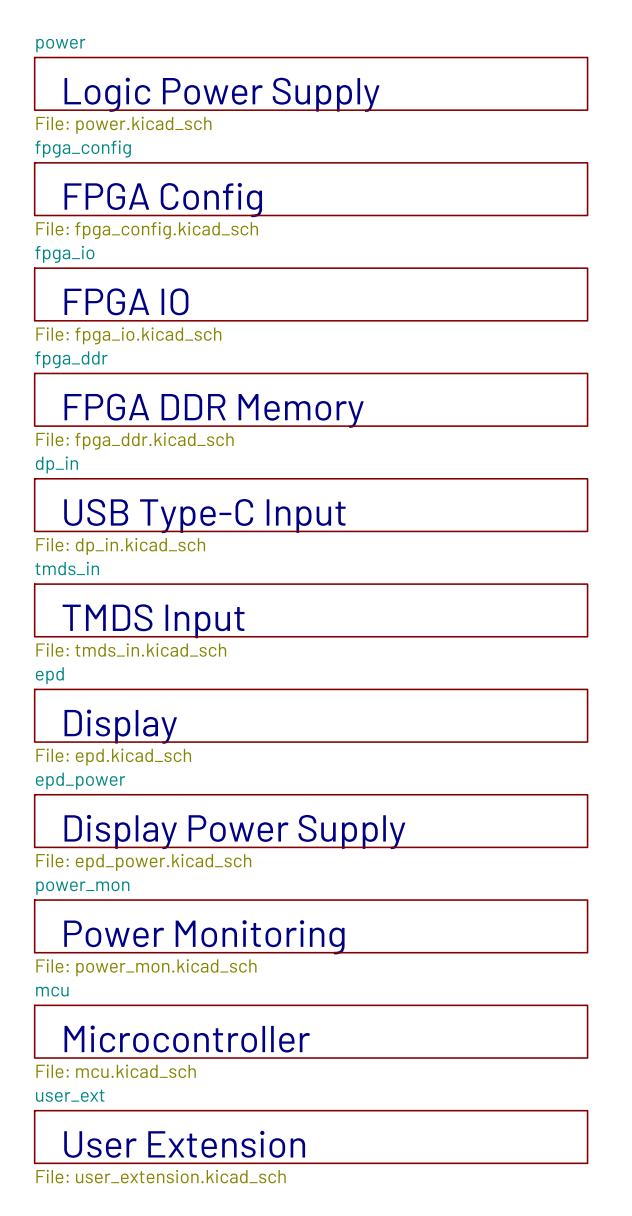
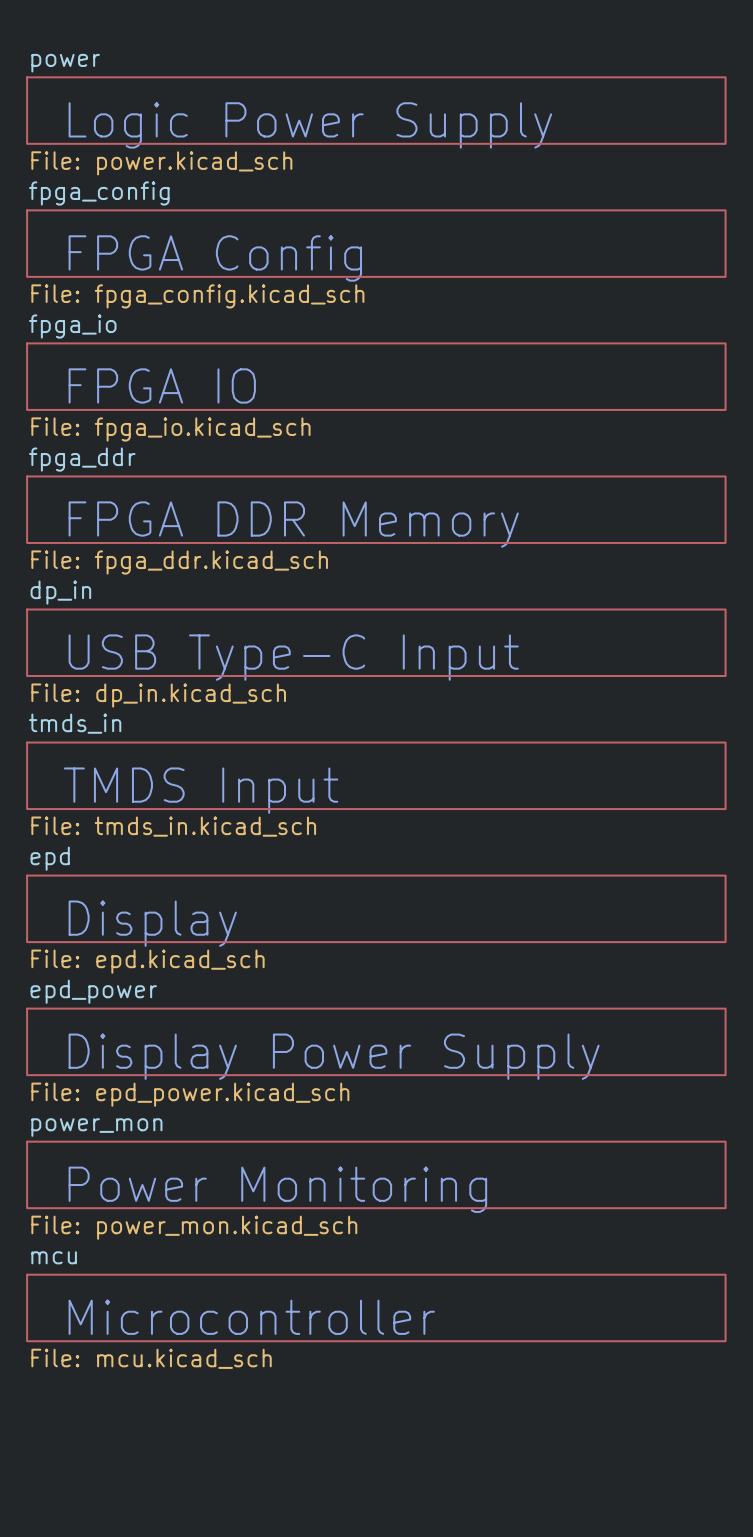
sheet user_ext: File: user_extension.kicad_sch (311, 1137) -> none
text: User Extension (184, 1144) -> none

